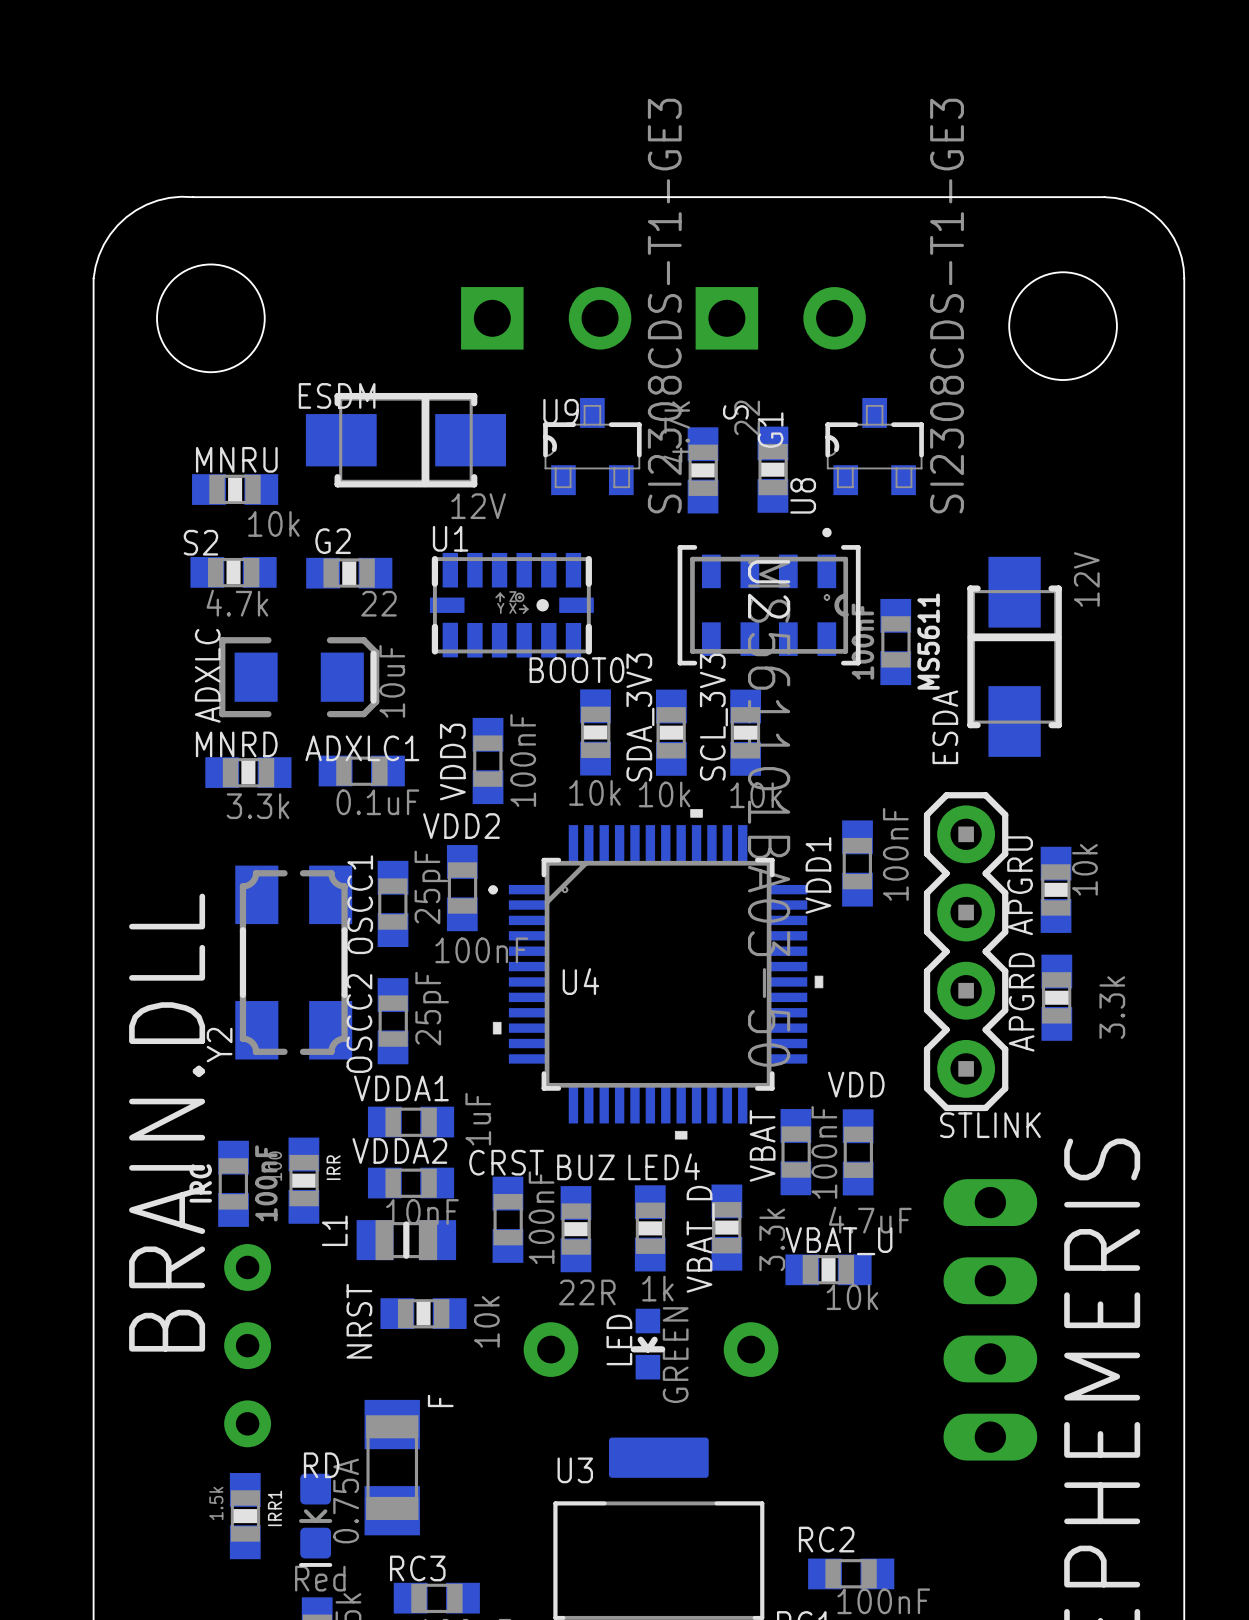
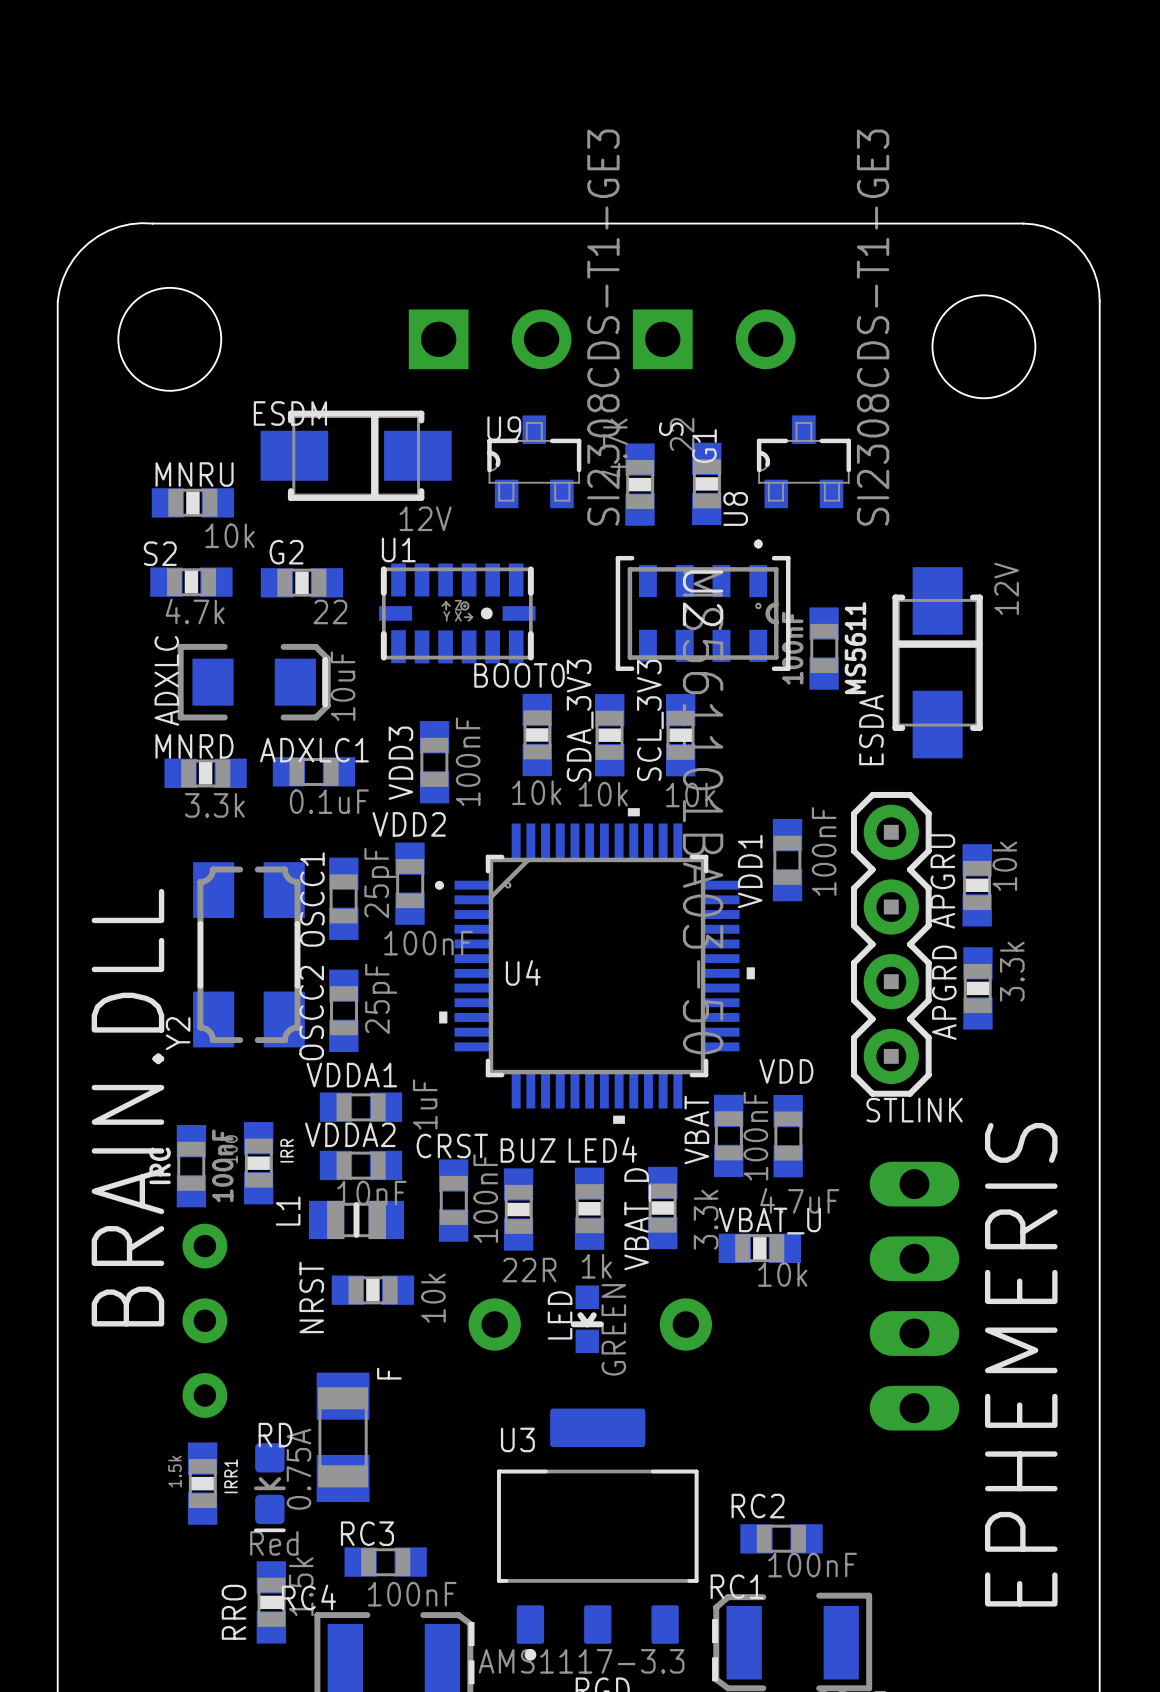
APGRD value position: 3.3k (1112, 1007) -> 3.3k (1012, 971)

